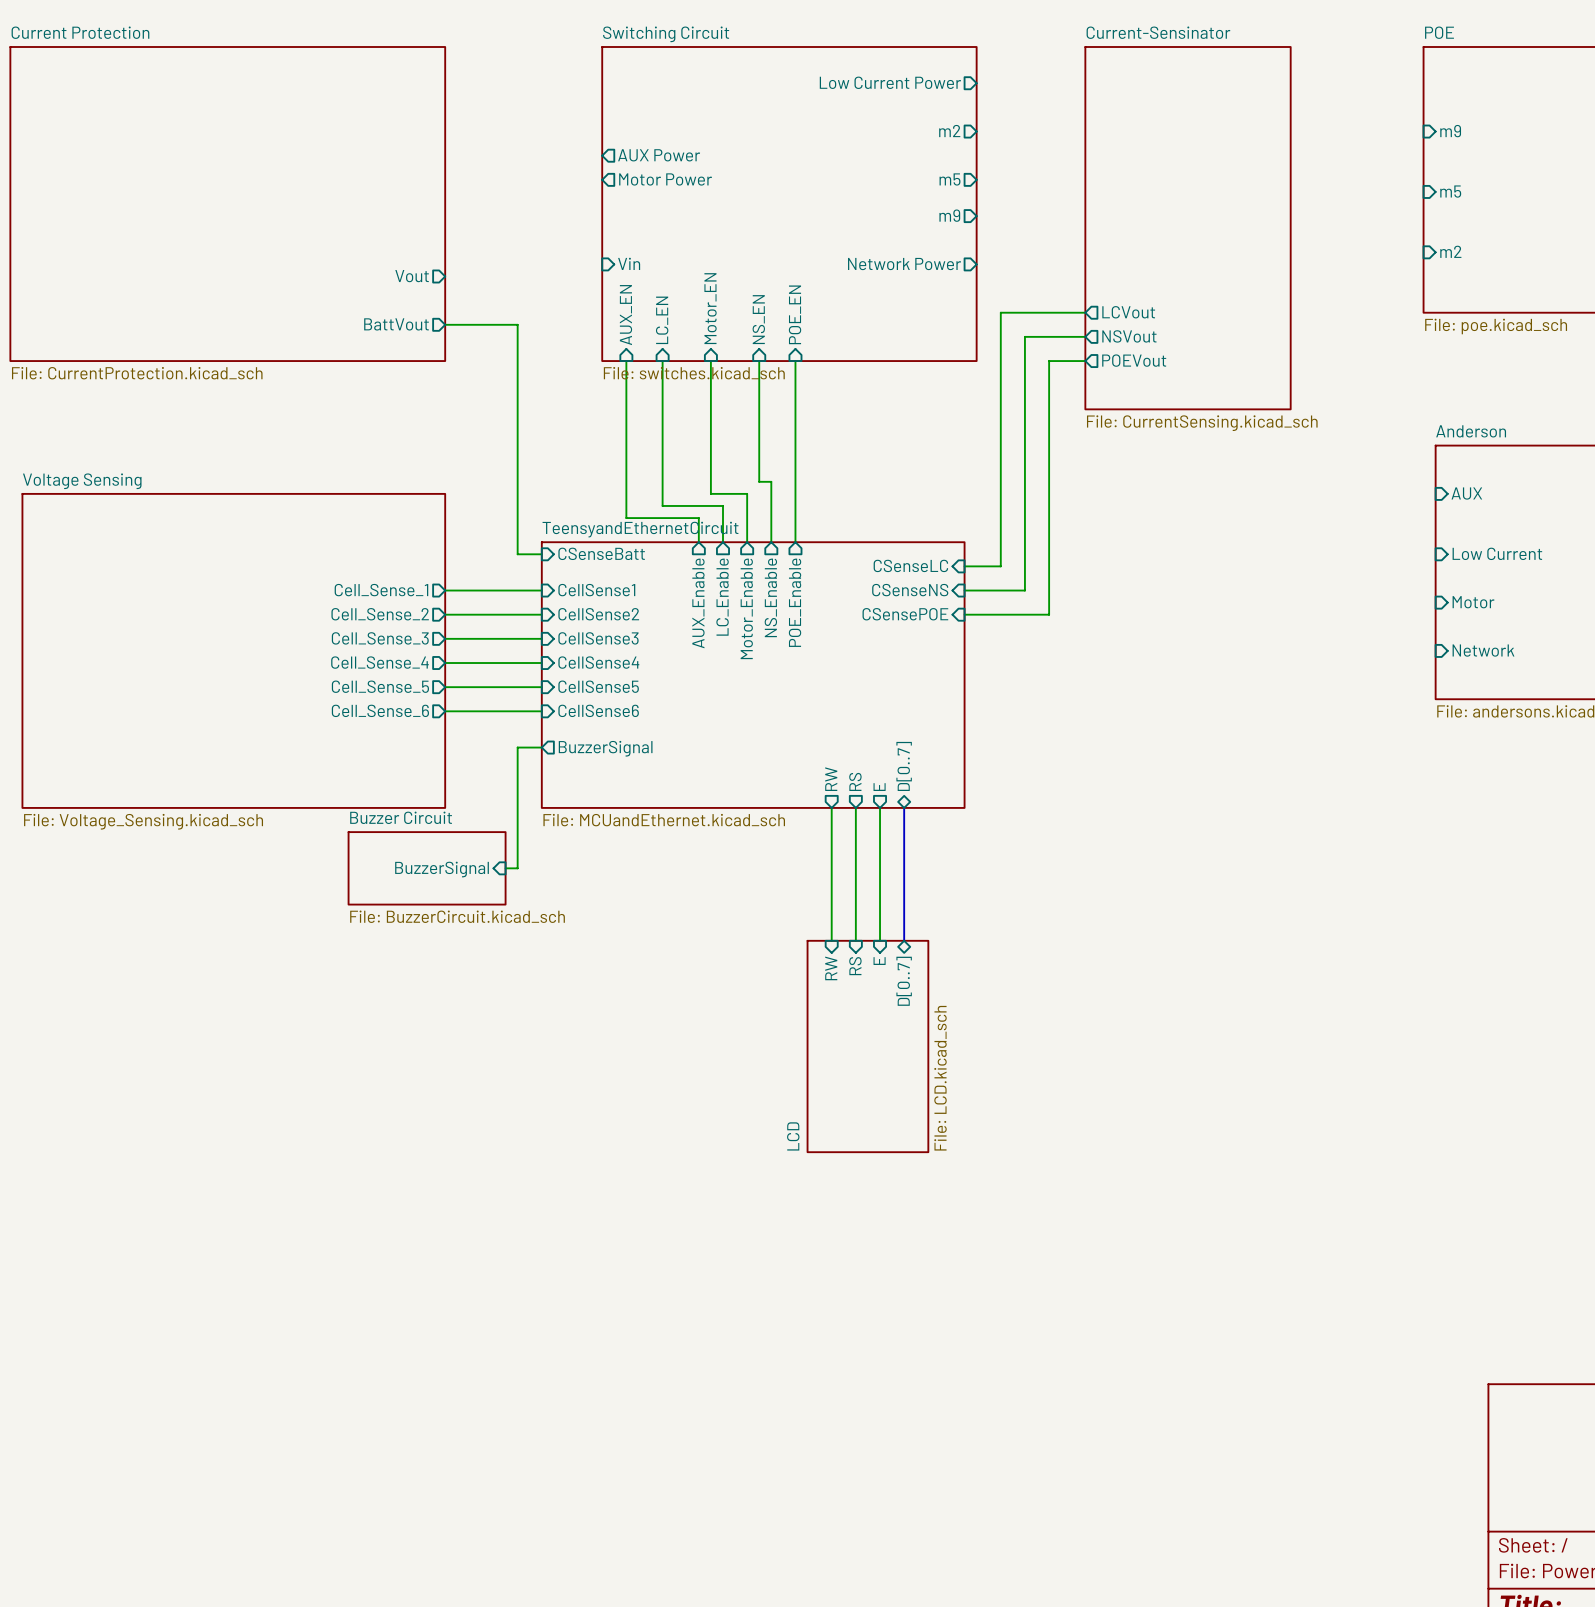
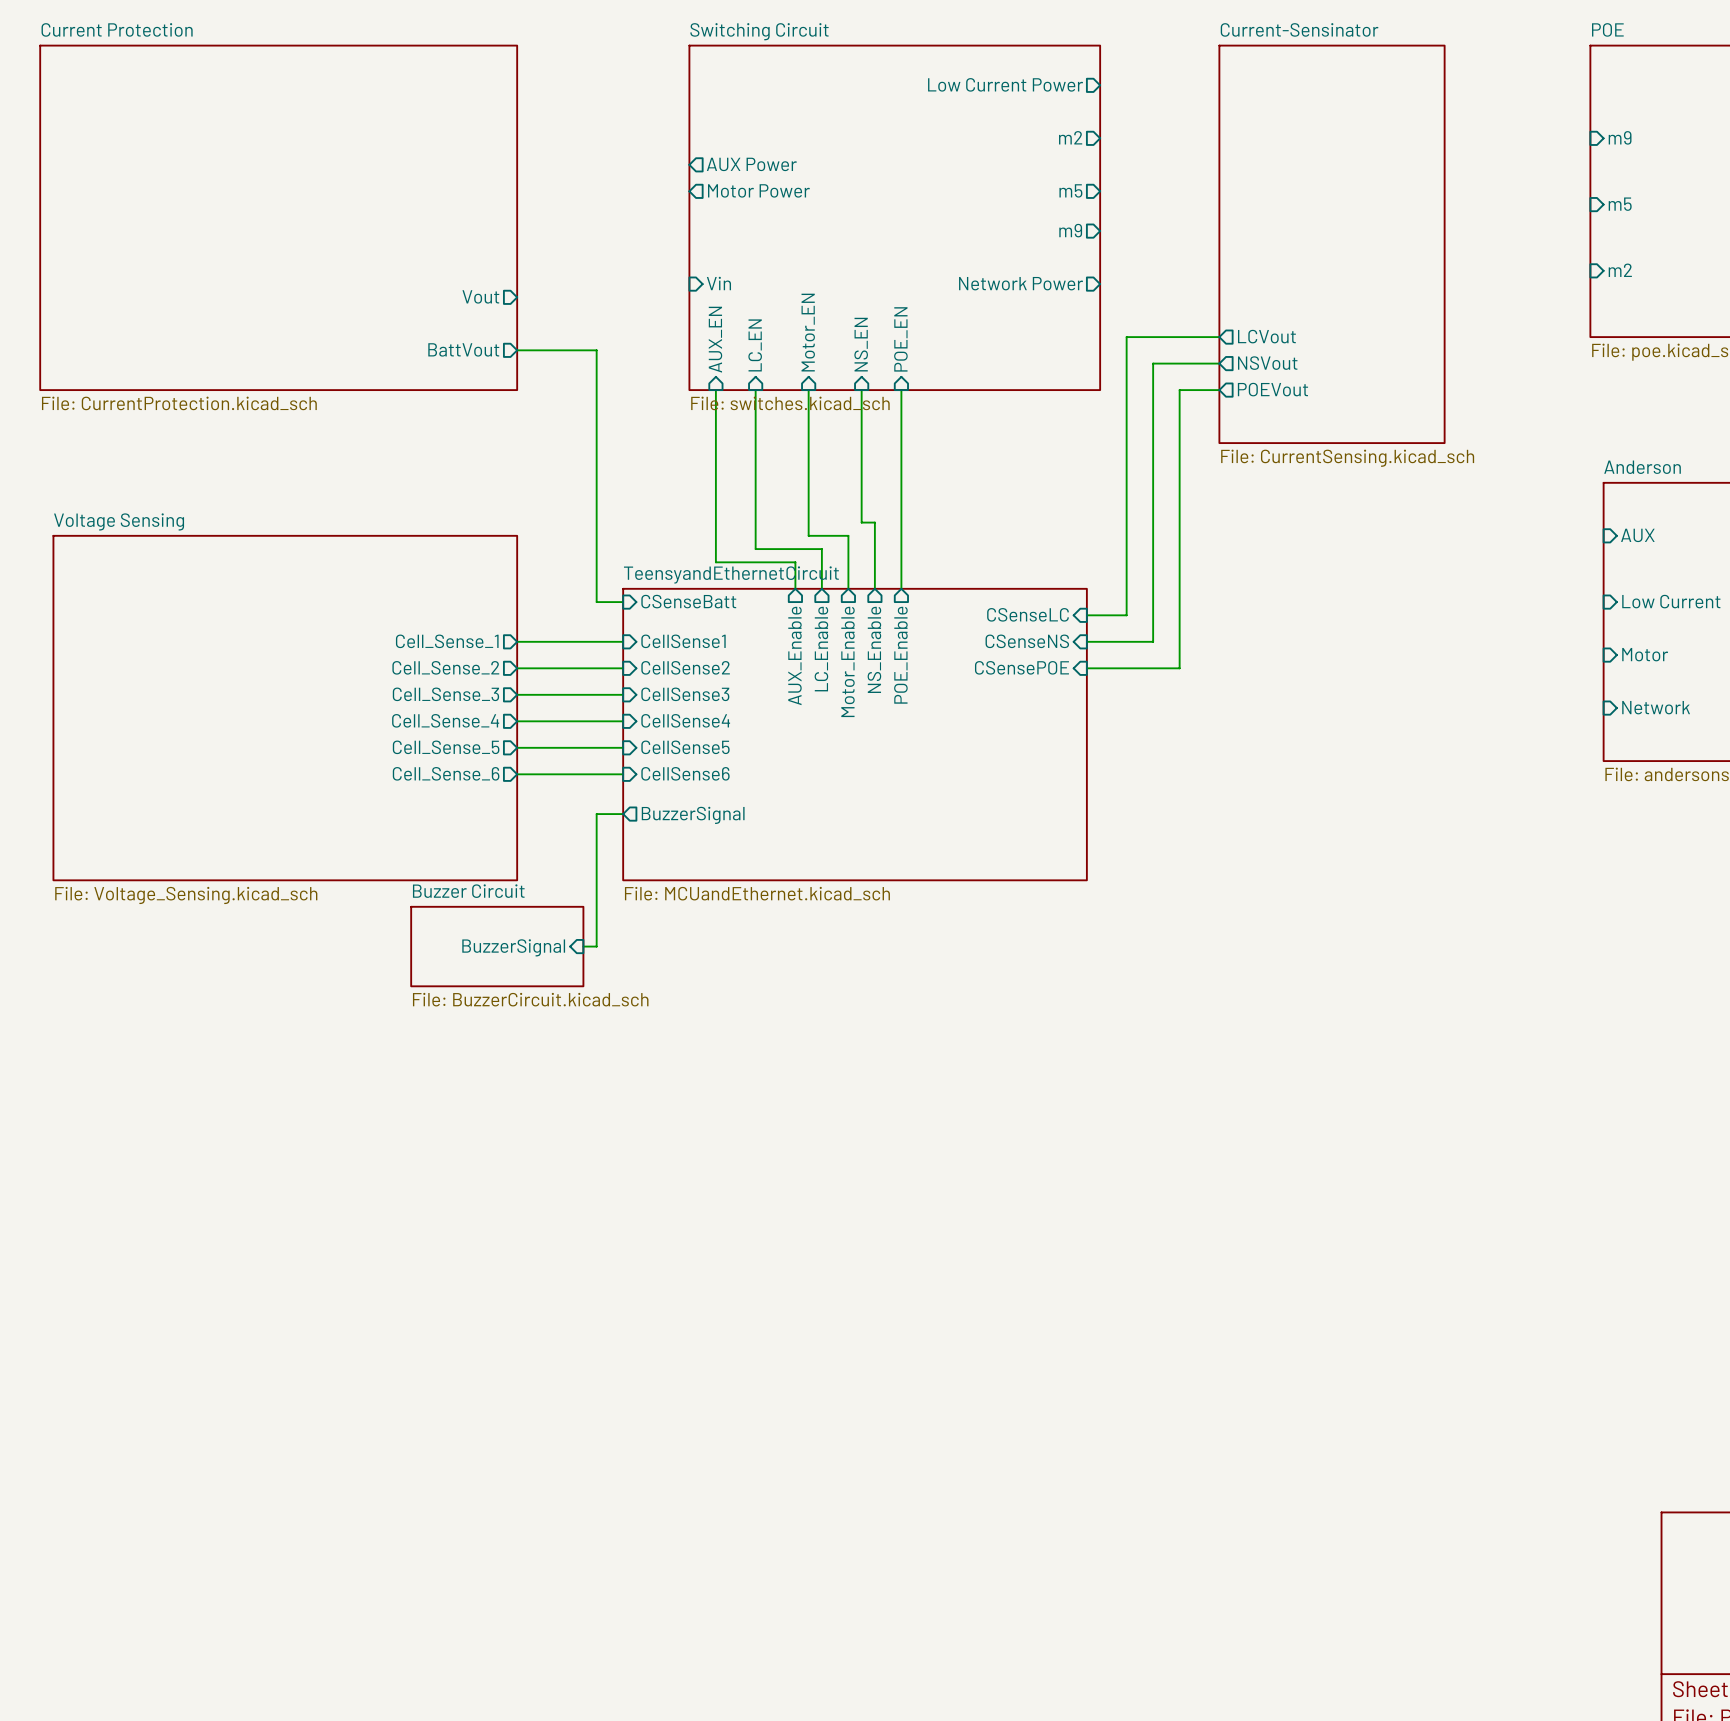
sheet pin: D[0..7] (904, 766) -> none
sheet pin: RW (831, 779) -> none
sheet pin: RS (855, 781) -> none
sheet pin: E (879, 787) -> none
wire: (831, 807) (831, 940) -> none
wire: (855, 807) (855, 940) -> none
wire: (880, 807) (880, 940) -> none
bus: (904, 807) (904, 940) -> none
sheet pin: E (879, 961) -> none
sheet pin: RS (855, 966) -> none
sheet pin: RW (831, 968) -> none
sheet pin: D[0..7] (904, 981) -> none
sheet LCD: File: LCD.kicad_sch (867, 1046) -> none

